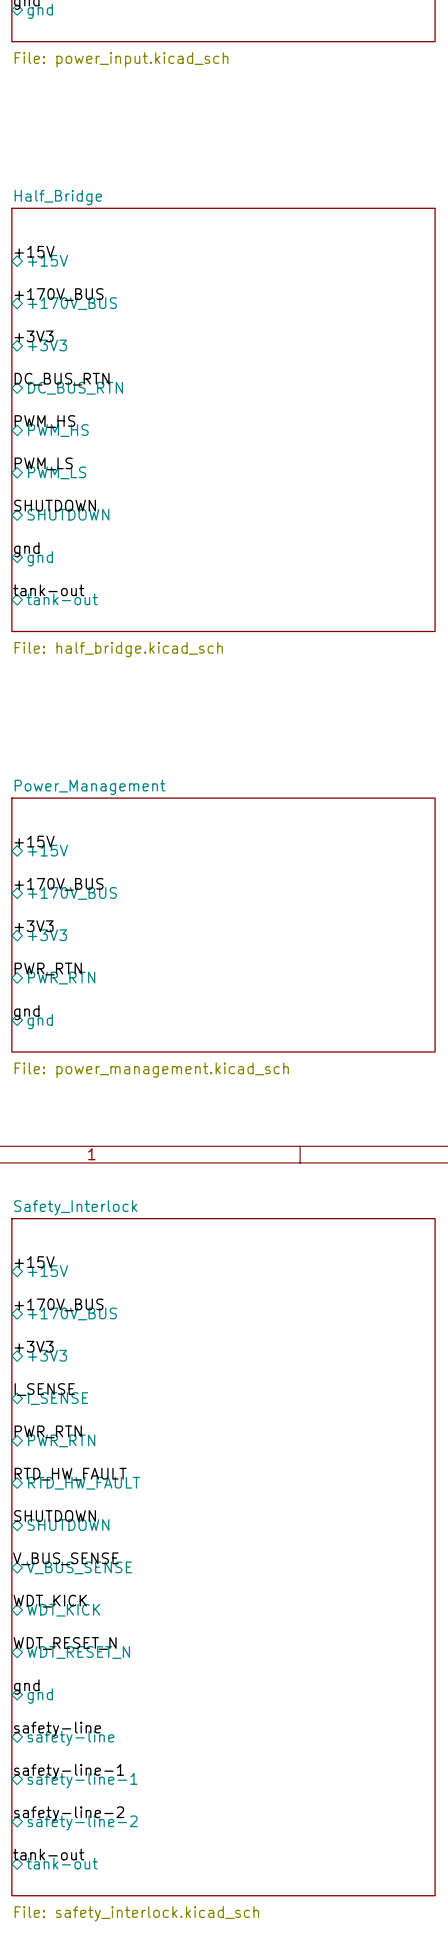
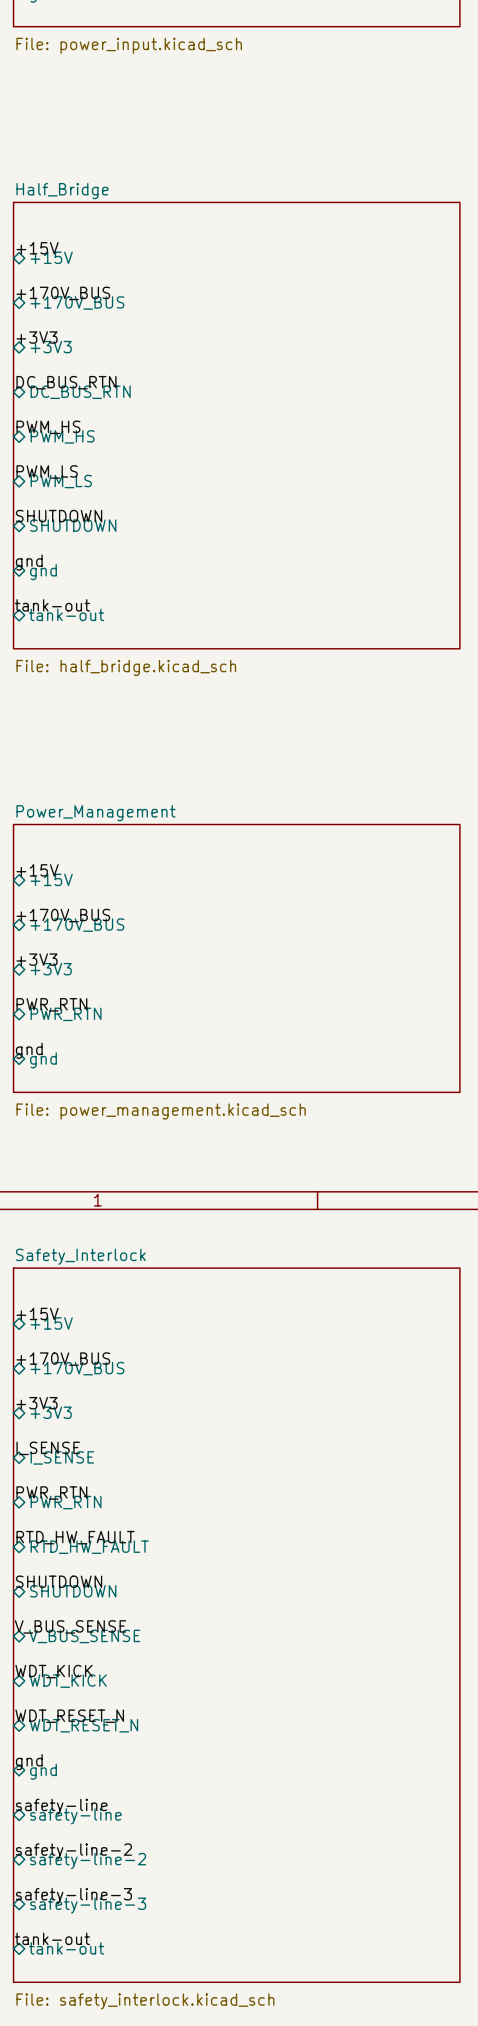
label: safety-line-1 (69, 1771) -> safety-line-2 (73, 1851)
sheet pin: safety-line-1 (82, 1780) -> safety-line-2 (88, 1860)
label: safety-line-2 (69, 1814) -> safety-line-3 (73, 1896)
sheet pin: safety-line-2 (82, 1823) -> safety-line-3 (88, 1905)

